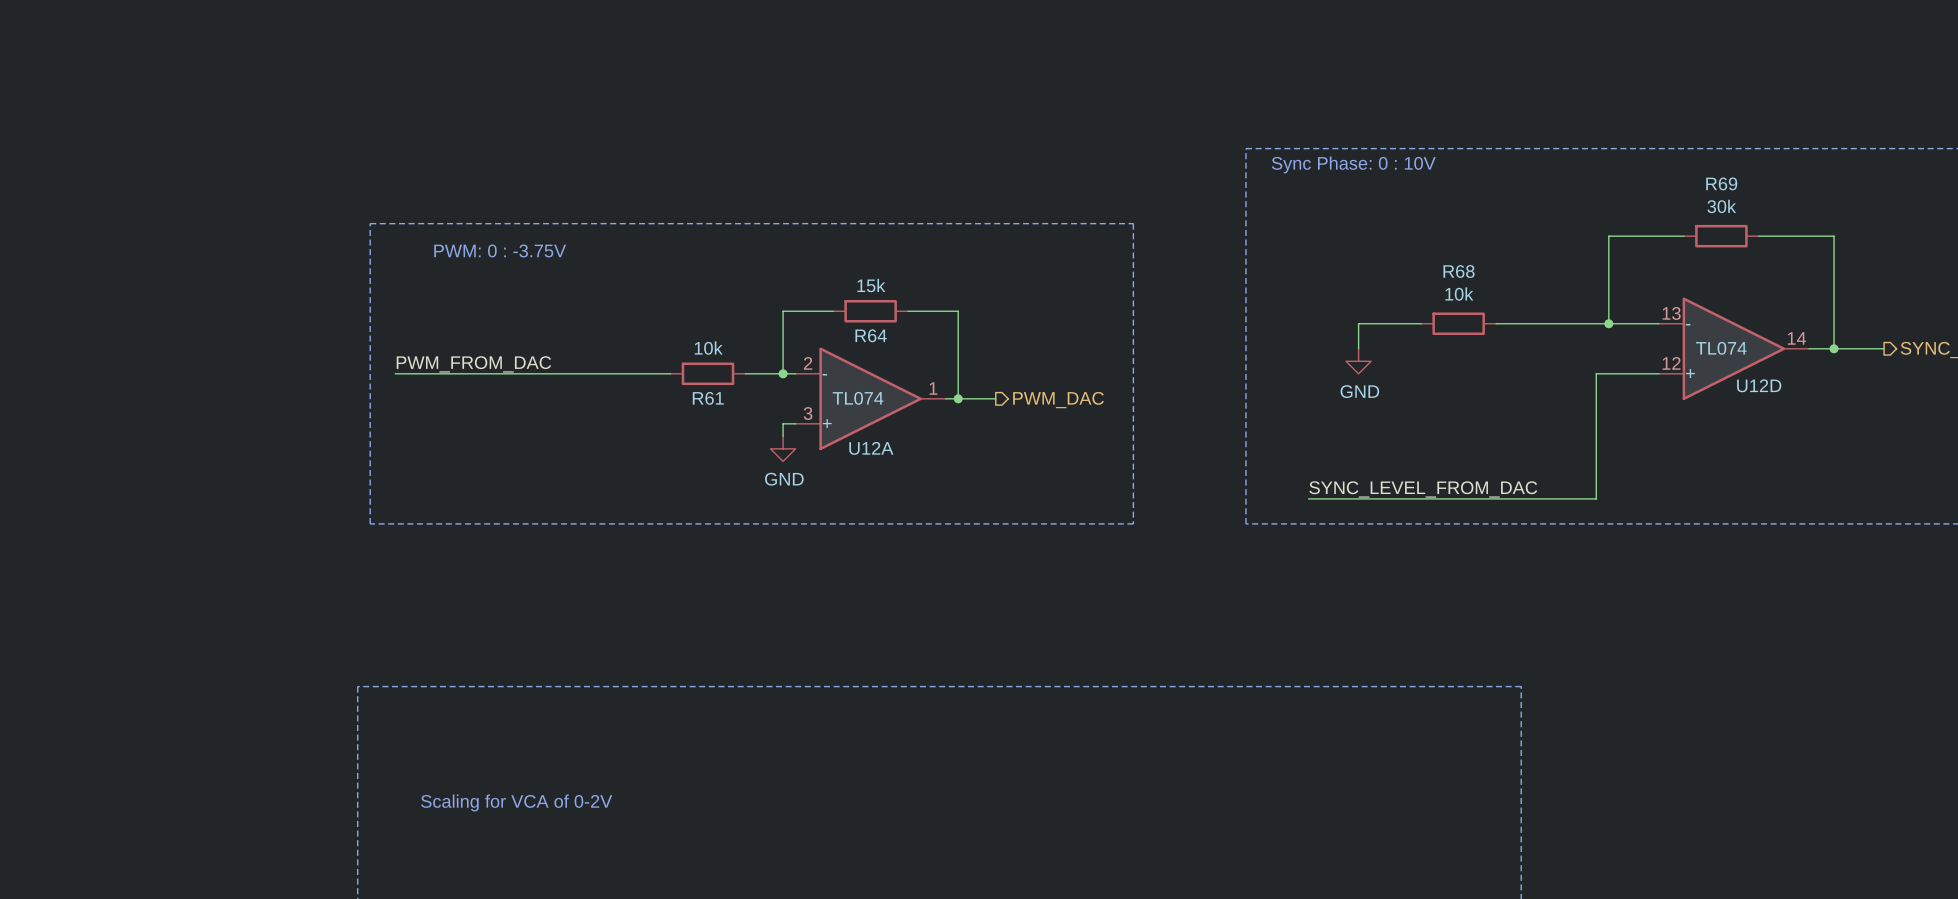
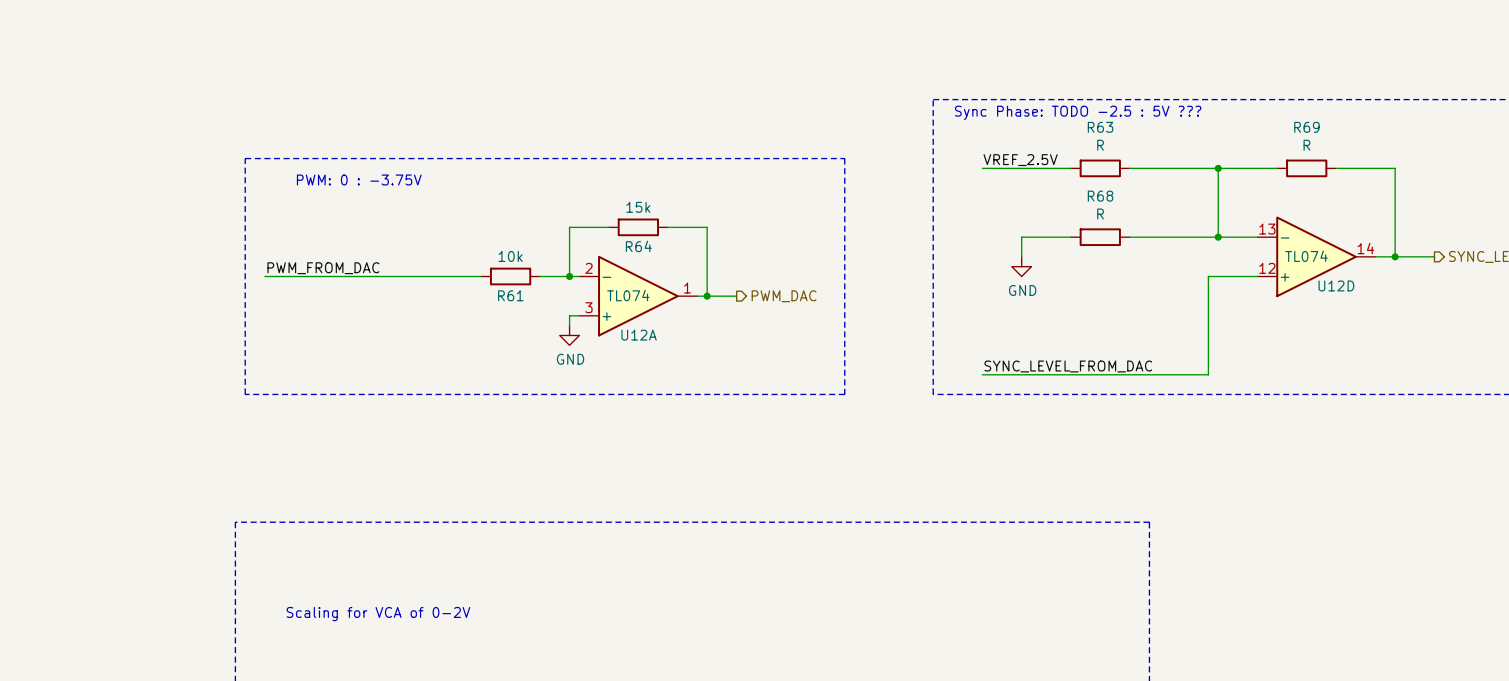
text: Sync Phase: 0 : 10V (1353, 164) -> Sync Phase: TODO -2.5 : 5V ??? (1078, 112)
R69 value: 30k (1721, 206) -> R (1306, 145)
label: none -> VREF_2.5V (1020, 160)
wire: none -> (982, 168) (1070, 168)
R63: none -> R (1100, 168)
wire: none -> (1129, 168) (1218, 168)
junction: none -> (1218, 168)
R68 value: 10k (1459, 294) -> R (1100, 214)

